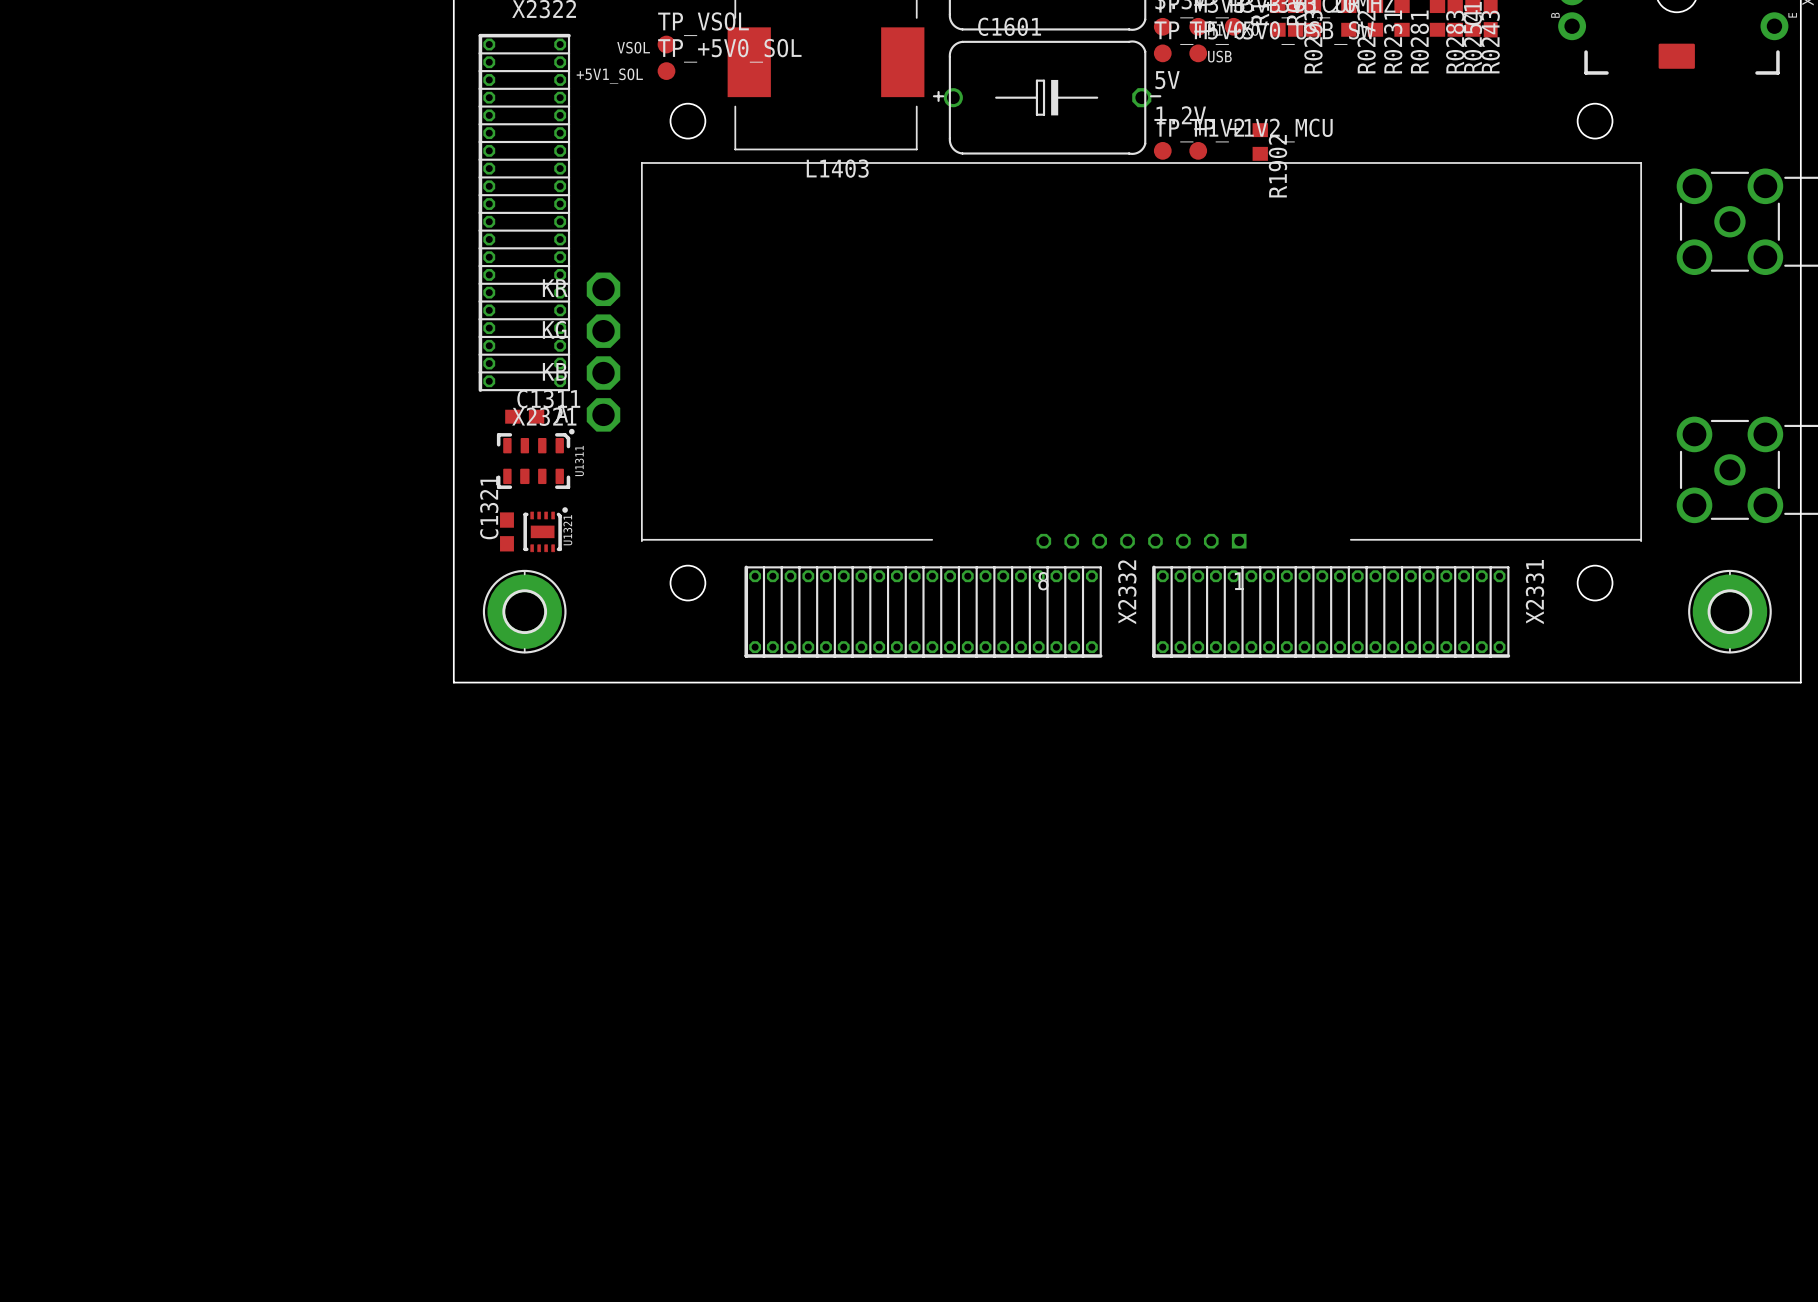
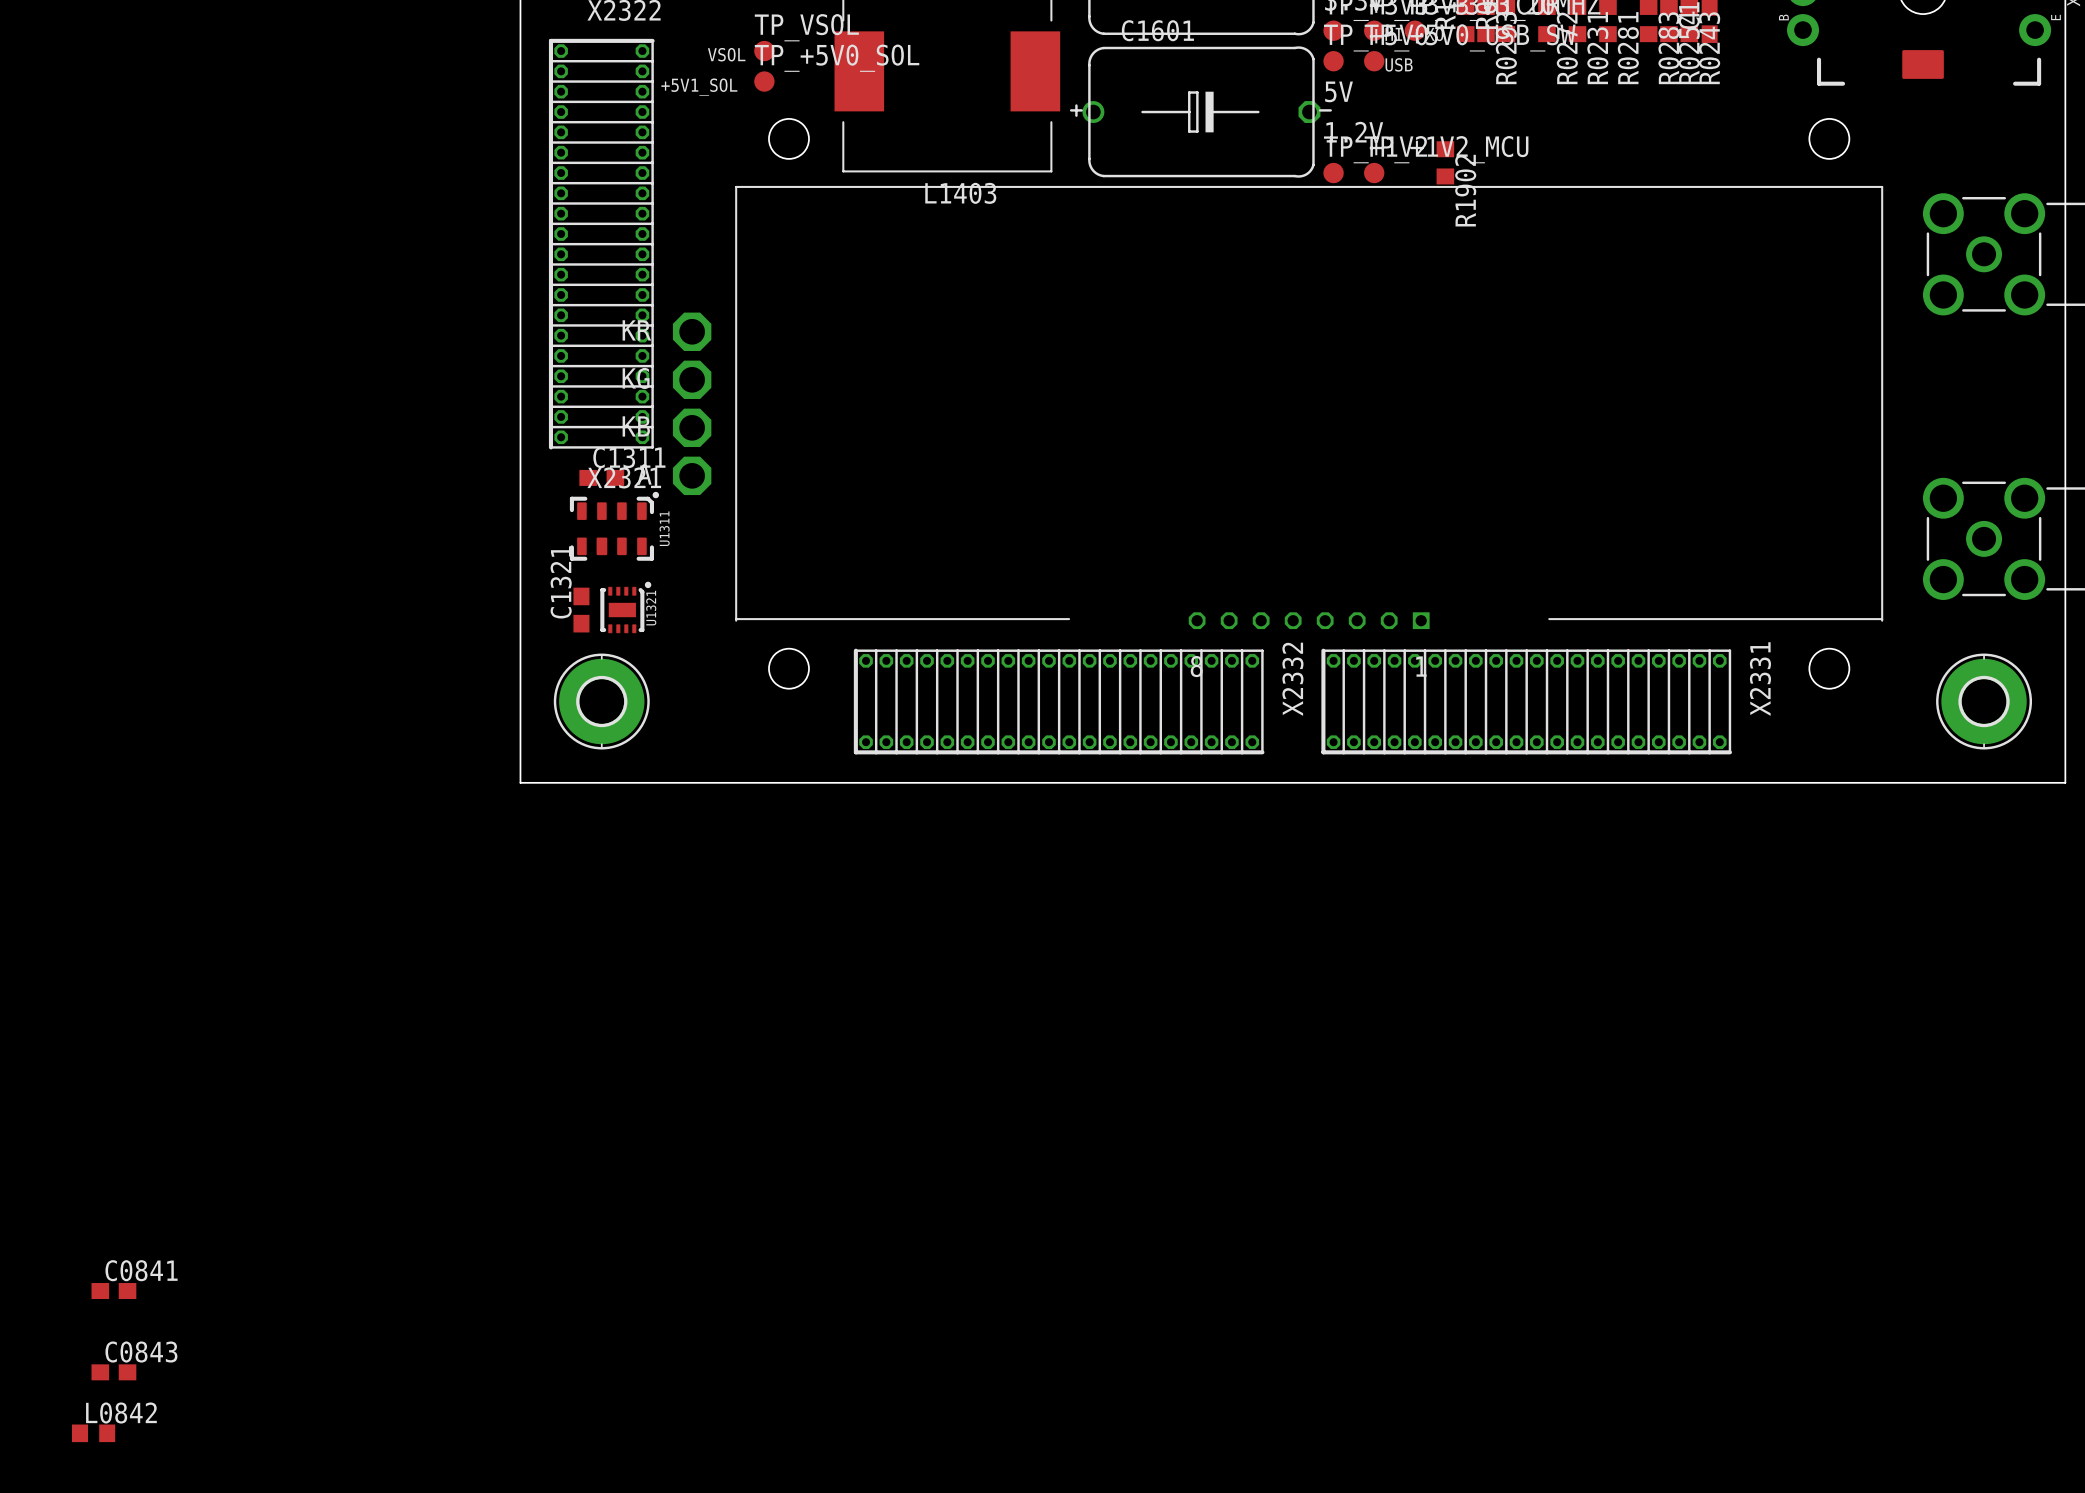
C0841: none -> (113, 1291)
C0843: none -> (113, 1372)
L0842: none -> (93, 1433)

